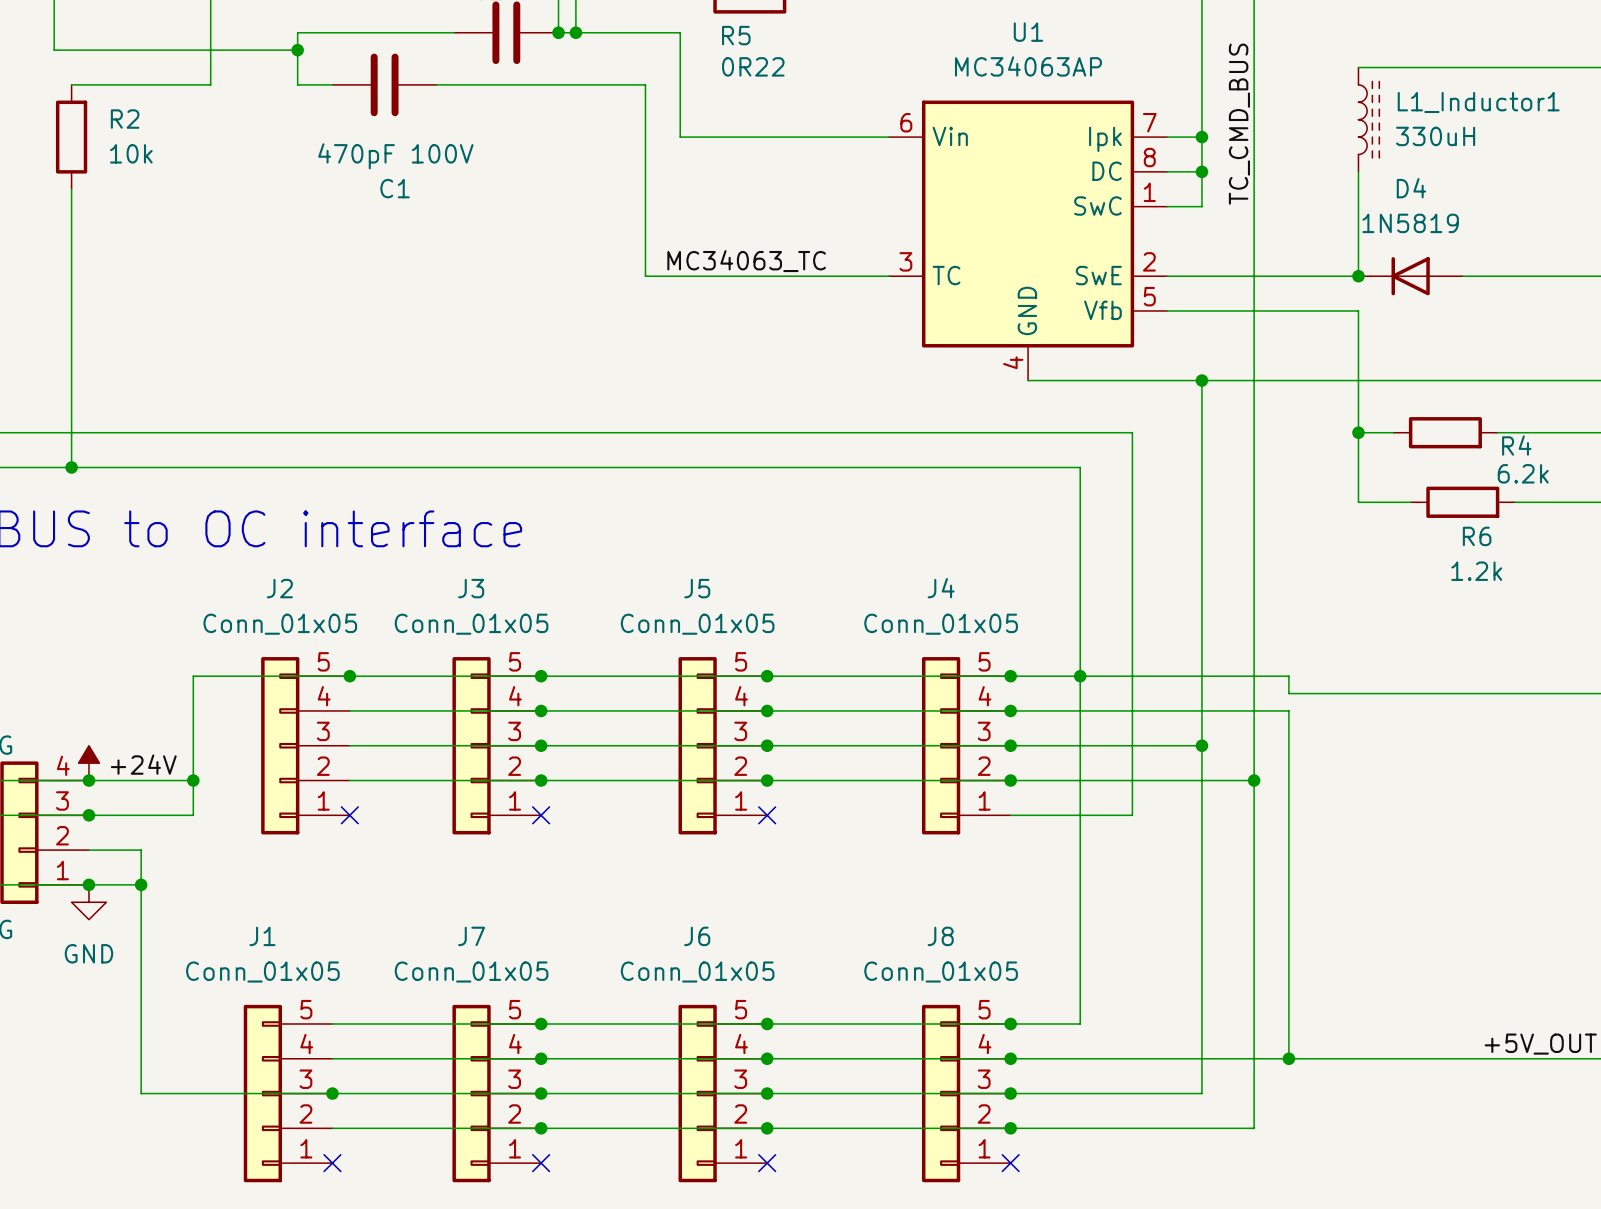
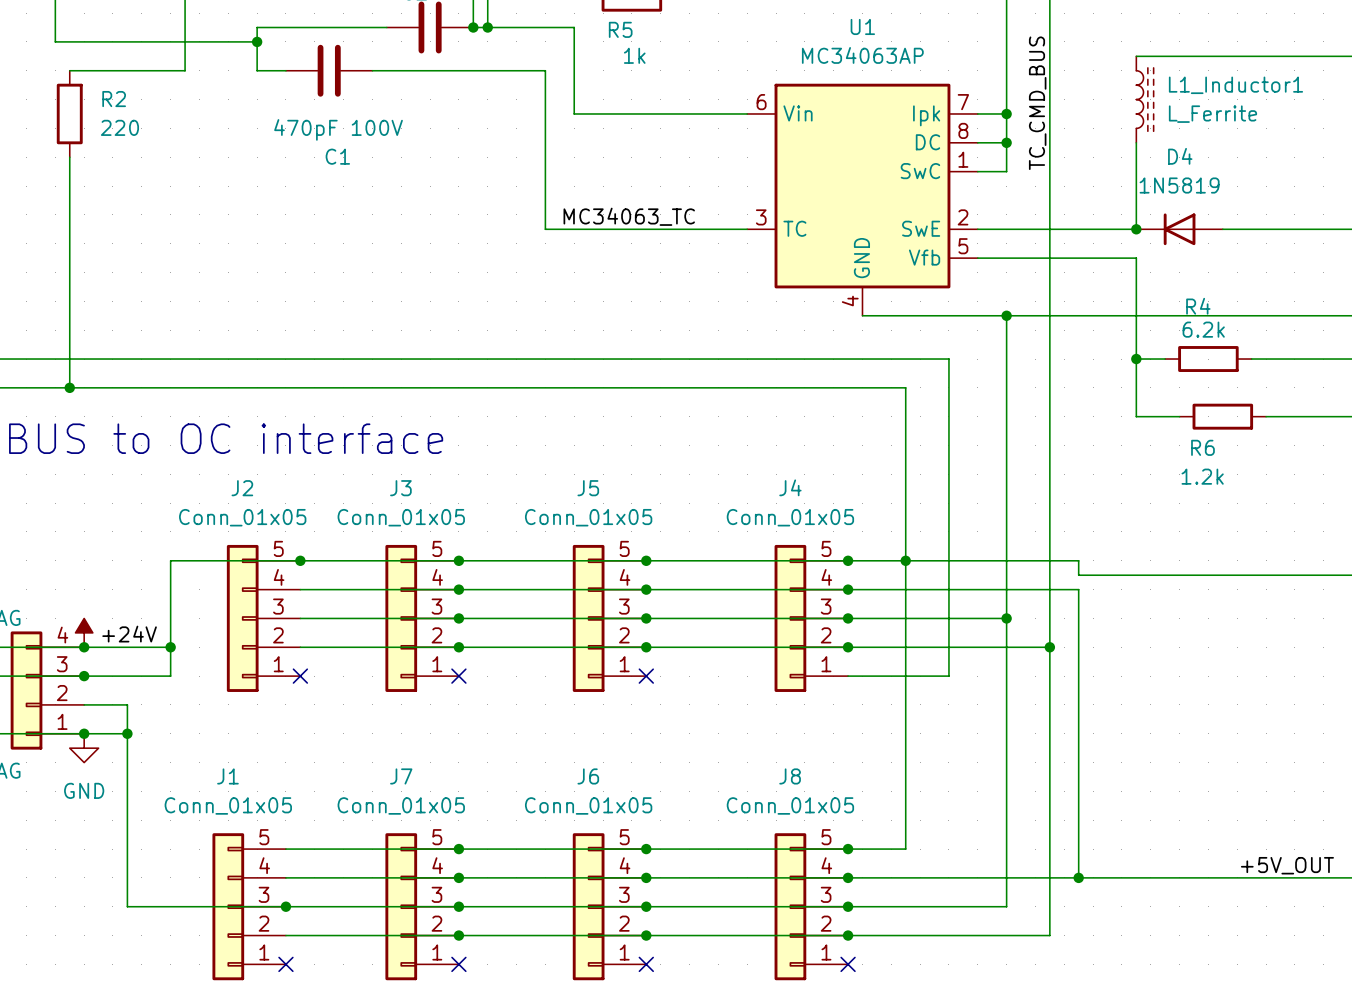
R5 value: 0R22 (753, 66) -> 1k (634, 55)
L1_Inductor1 value: 330uH (1435, 136) -> L_Ferrite (1212, 114)
R2 value: 10k (131, 153) -> 220 (119, 127)
R4 name position: R4 (1516, 445) -> R4 (1198, 306)
R4 value position: 6.2k (1523, 473) -> 6.2k (1203, 329)
R6 name position: R6 (1477, 536) -> R6 (1202, 447)
R6 value position: 1.2k (1476, 571) -> 1.2k (1202, 476)

